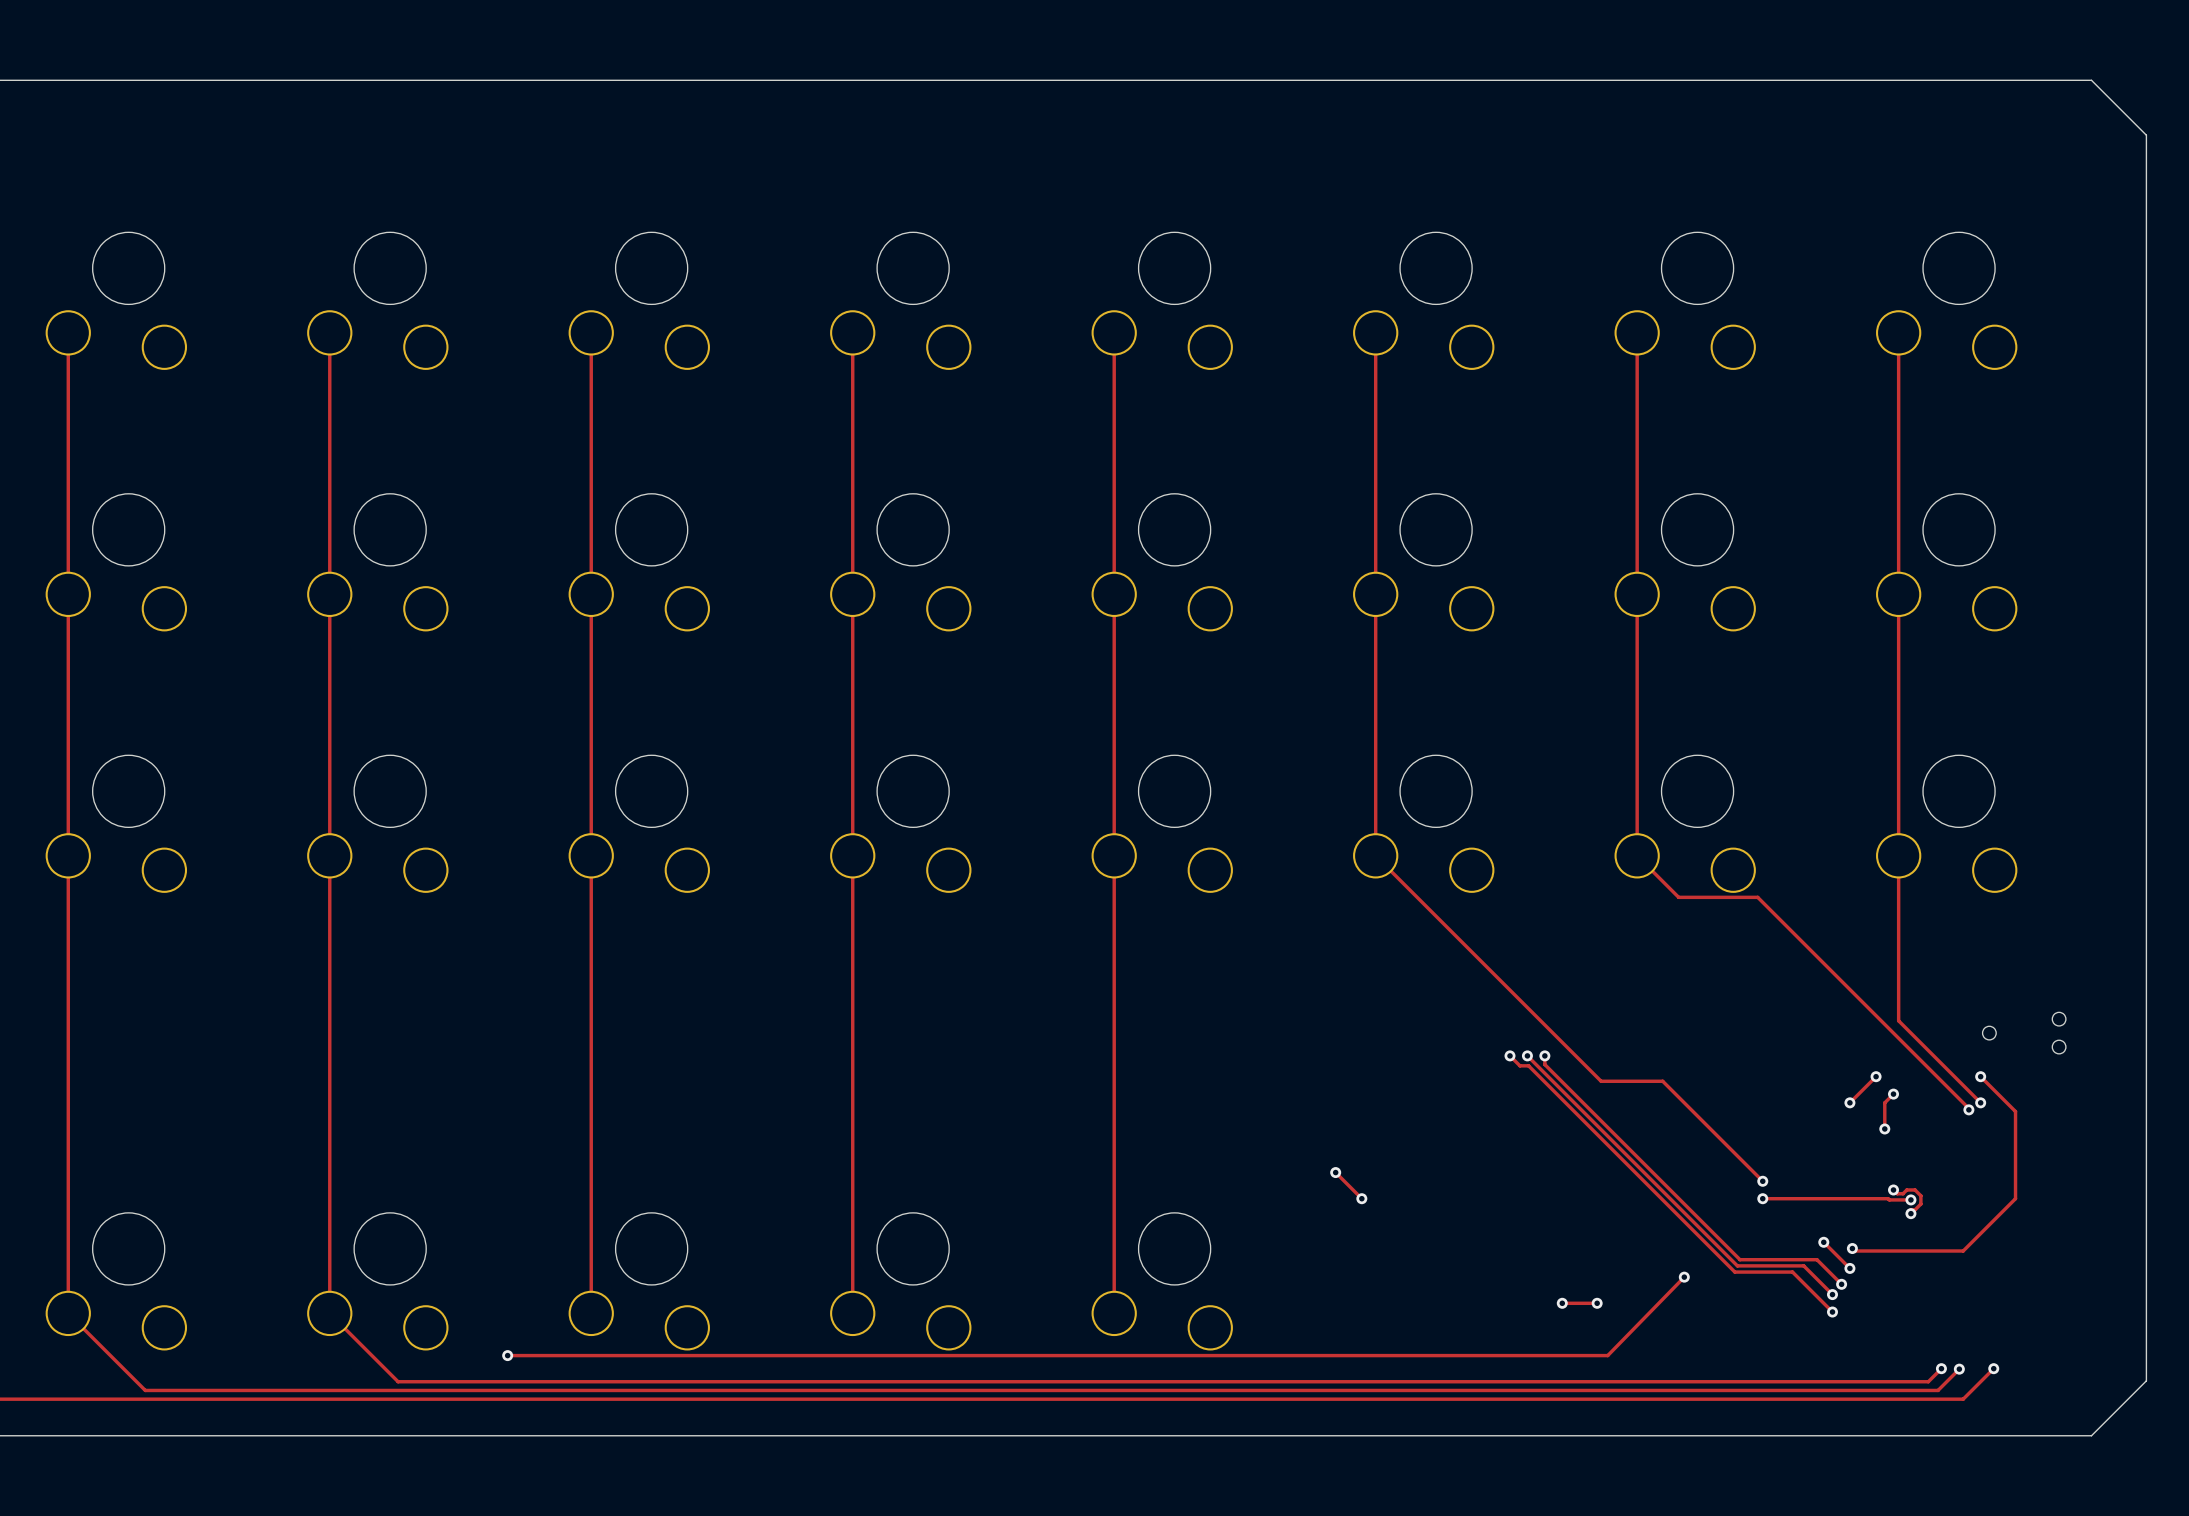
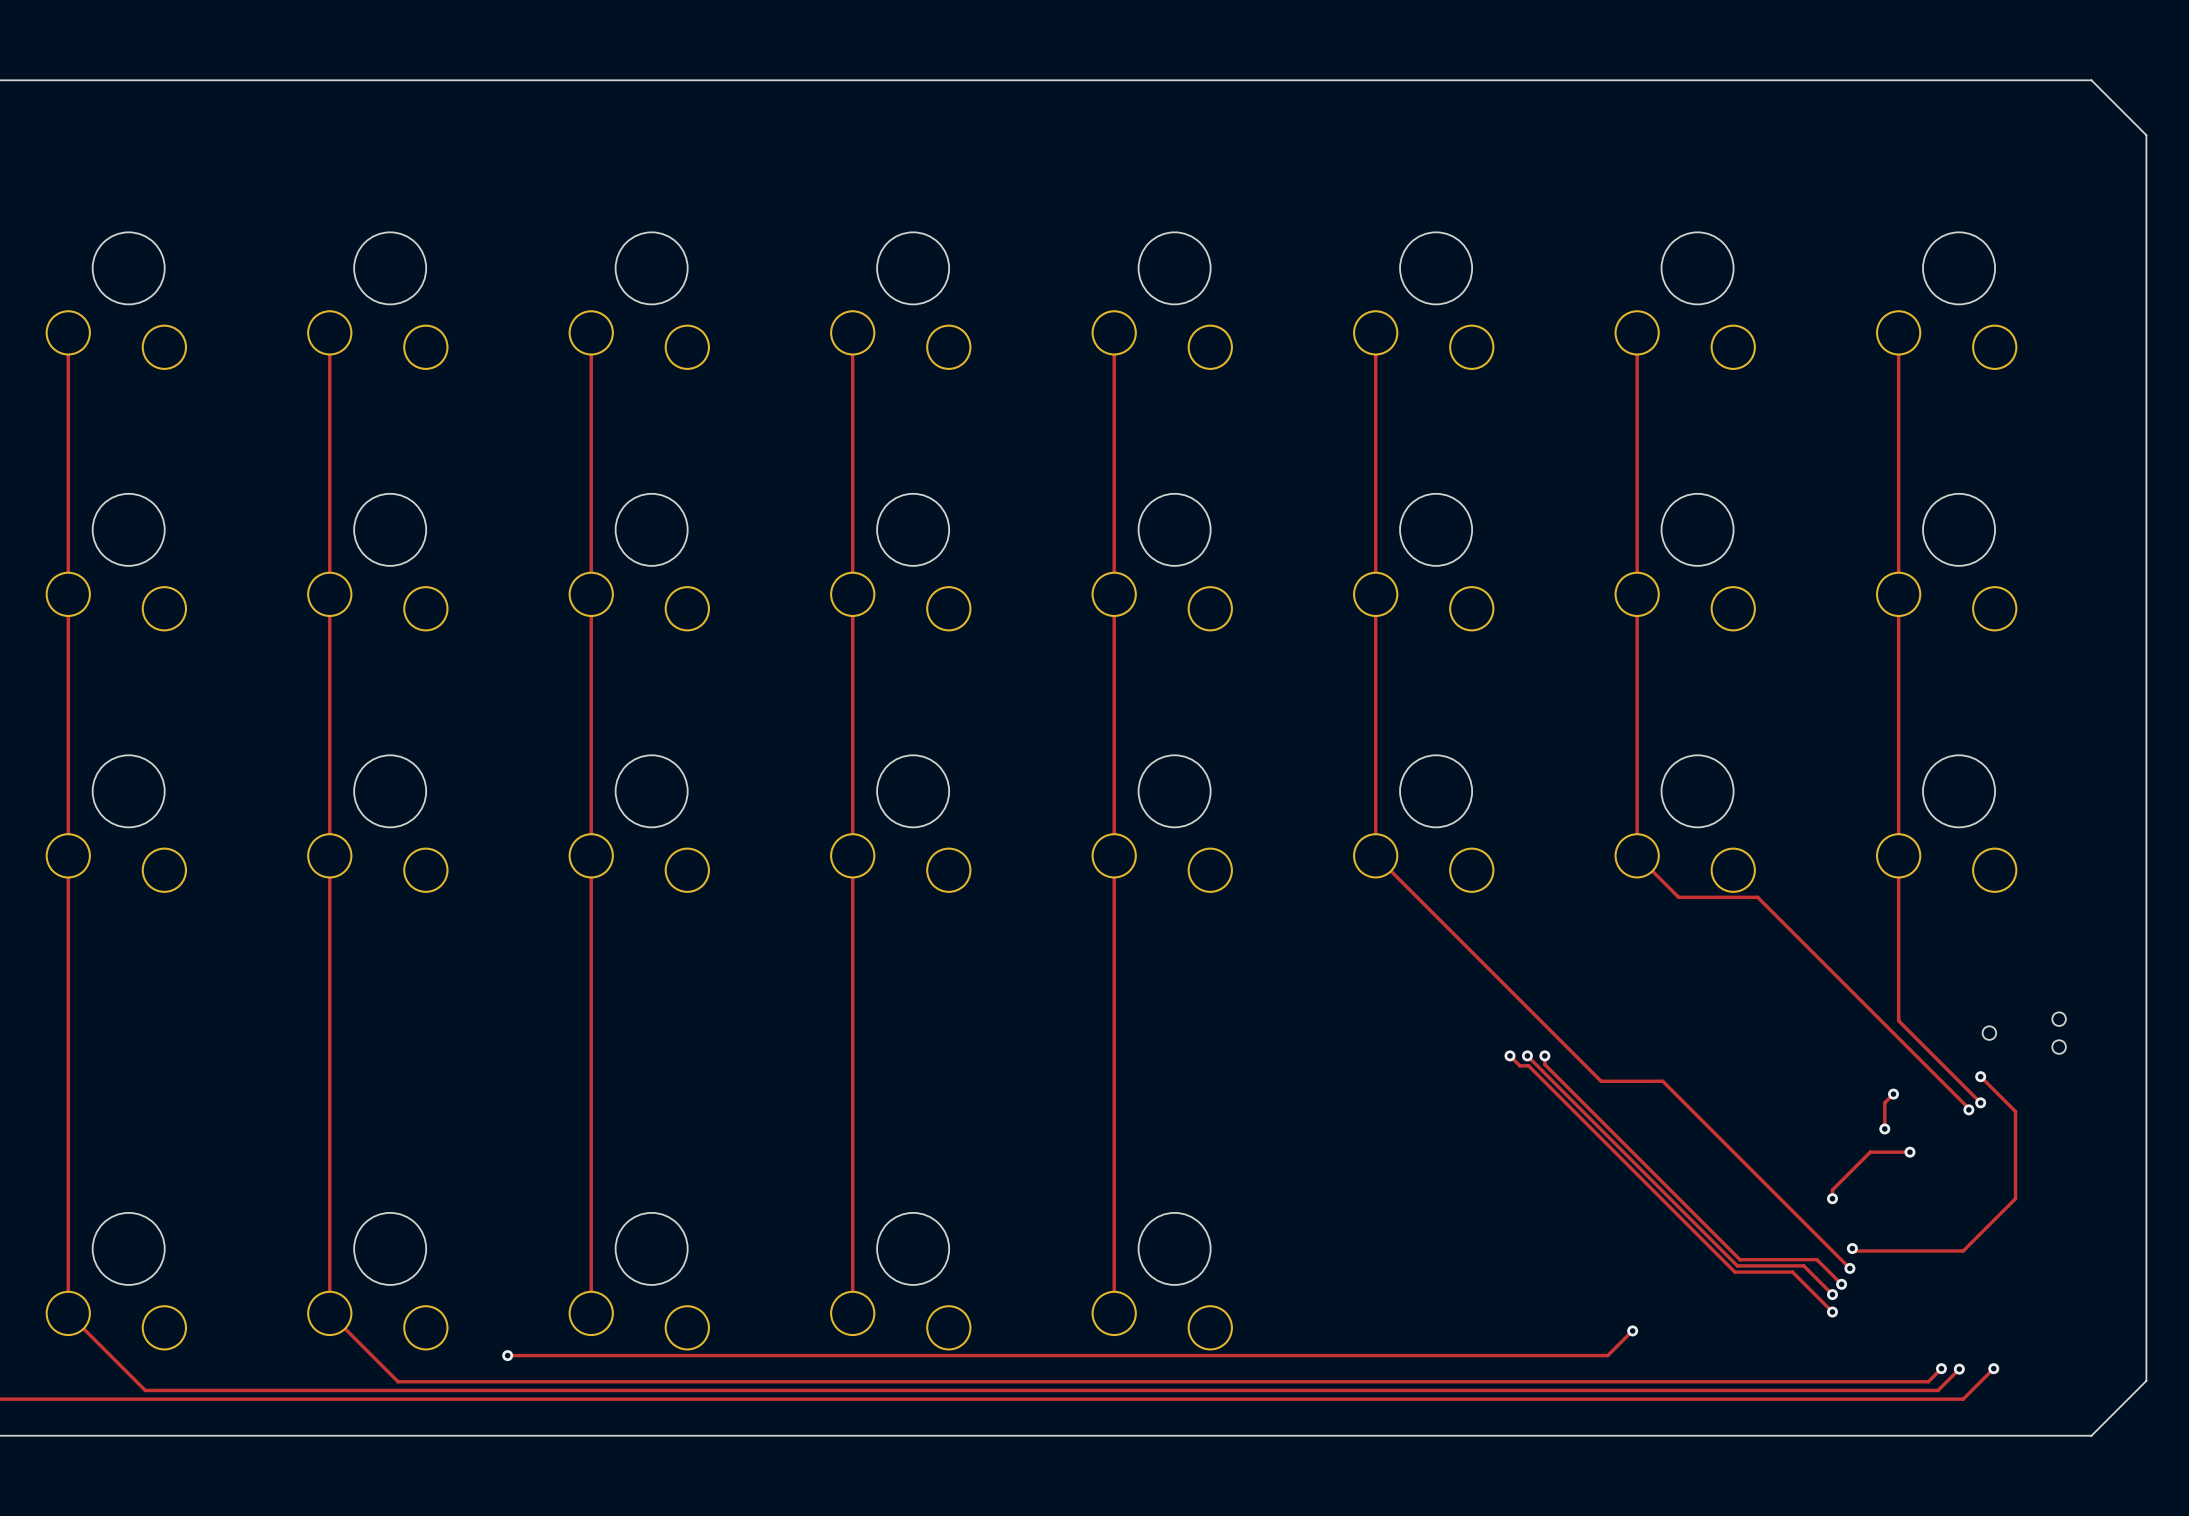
track: (1876, 1076) (1849, 1102) -> none
via: (1876, 1076) -> none
via: (1849, 1102) -> none
track: none -> (1909, 1152) (1870, 1152) (1832, 1189) (1832, 1198) (1830, 1200)
via: none -> (1909, 1152)
track: (1335, 1172) (1361, 1198) -> none
via: (1335, 1172) -> none
track: none -> (1762, 1181) (1823, 1242)
via: (1762, 1181) -> none
track: (1893, 1189) (1897, 1193) (1903, 1193) (1906, 1189) (1915, 1189) (1920, 1195) (1920, 1204) (1915, 1209) (1910, 1209) (1910, 1213) -> none
via: (1893, 1189) -> none
via: (1361, 1198) -> none
via: (1762, 1198) -> none
via: none -> (1832, 1198)
track: (1910, 1199) (1762, 1198) (1762, 1200) -> none
via: (1910, 1199) -> none
via: (1910, 1213) -> none
via: (1823, 1242) -> none
track: (1684, 1277) (1607, 1355) -> (1632, 1330) (1607, 1355)
via: (1684, 1277) -> none
track: (1562, 1303) (1597, 1303) -> none
via: (1562, 1303) -> none
via: (1597, 1303) -> none
via: none -> (1632, 1330)

